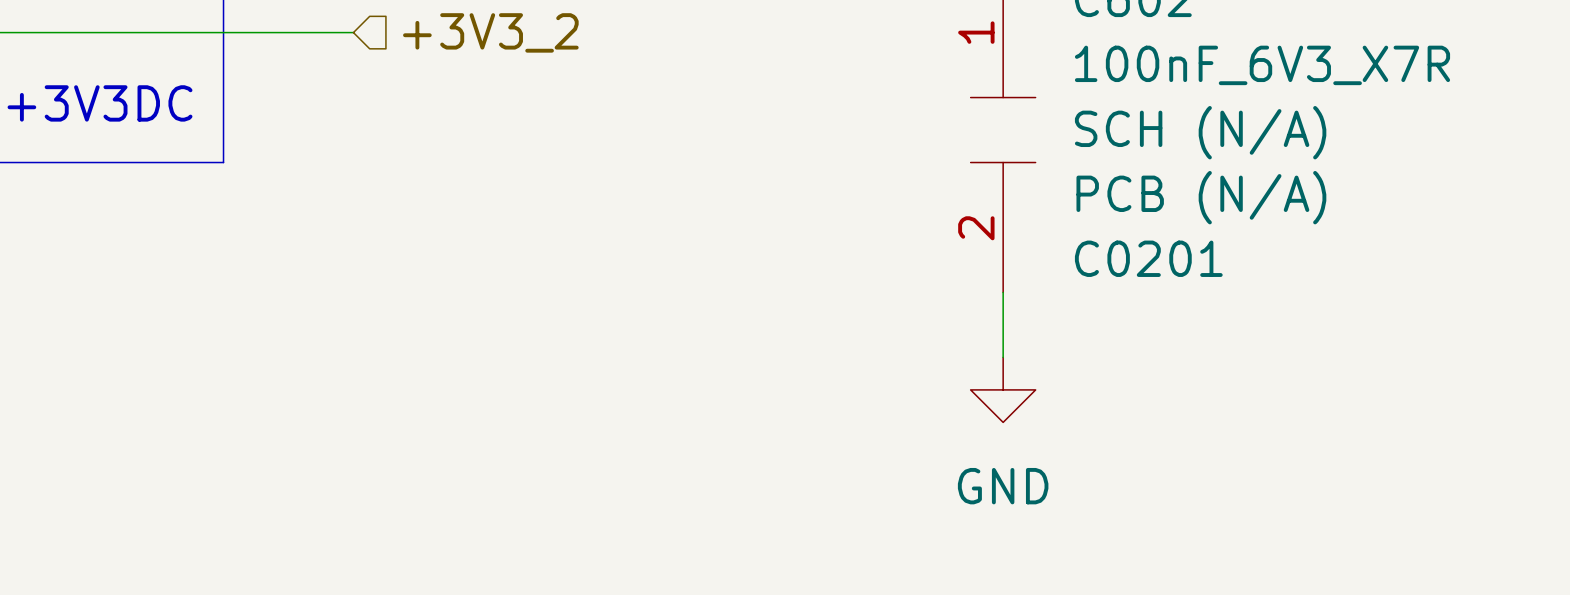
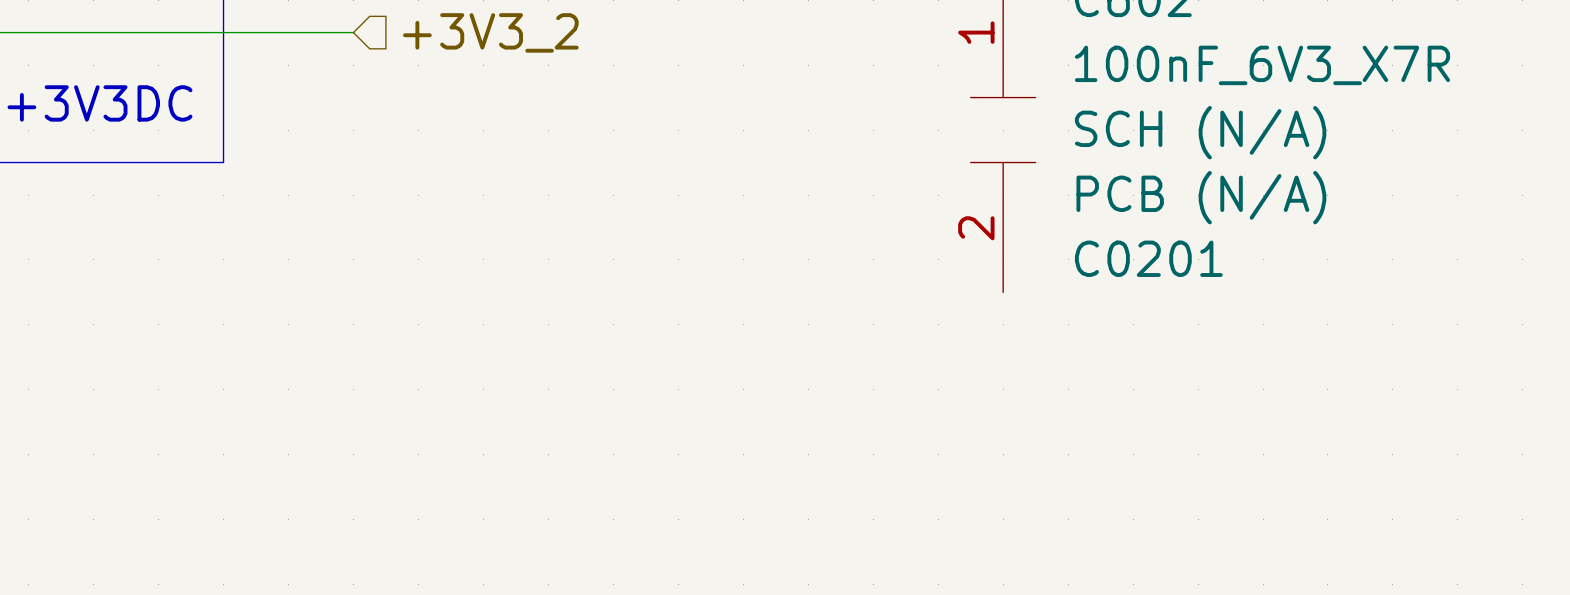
wire: (1003, 292) (1003, 357) -> none
power symbol: GND (1003, 389) -> none

